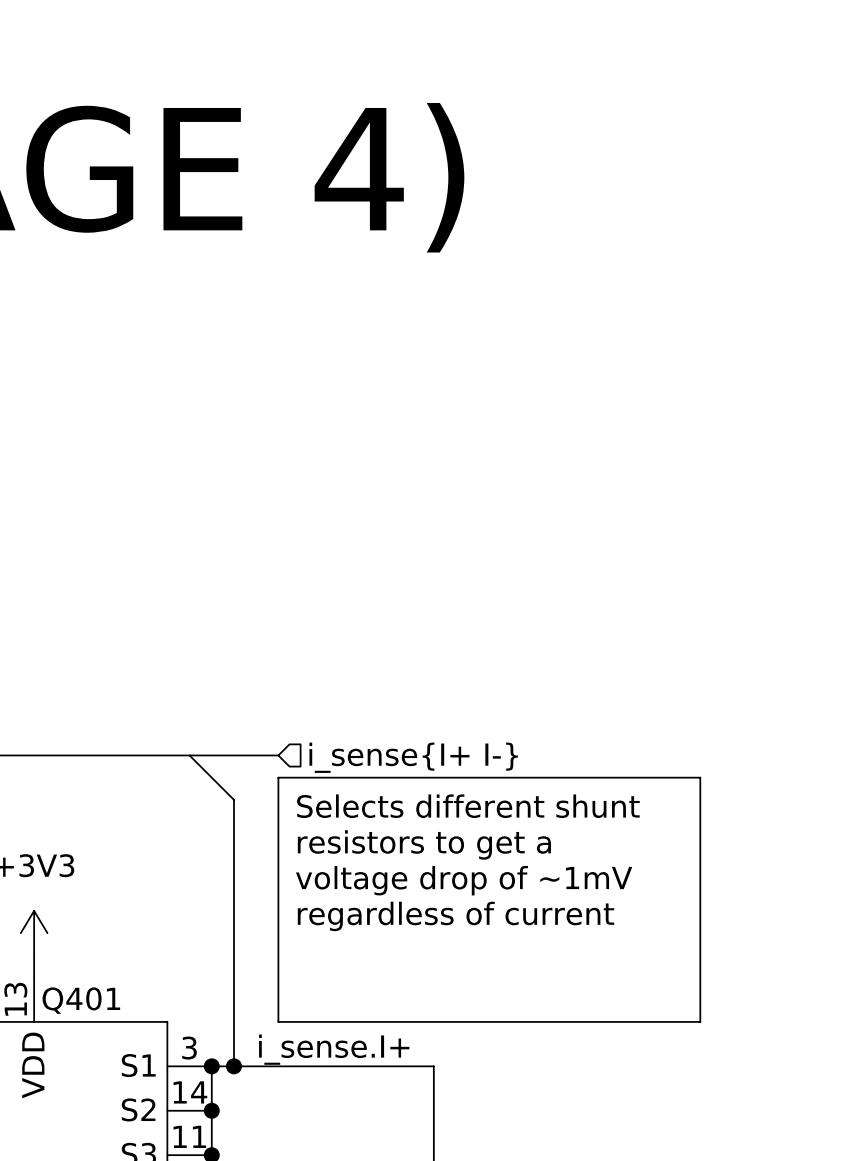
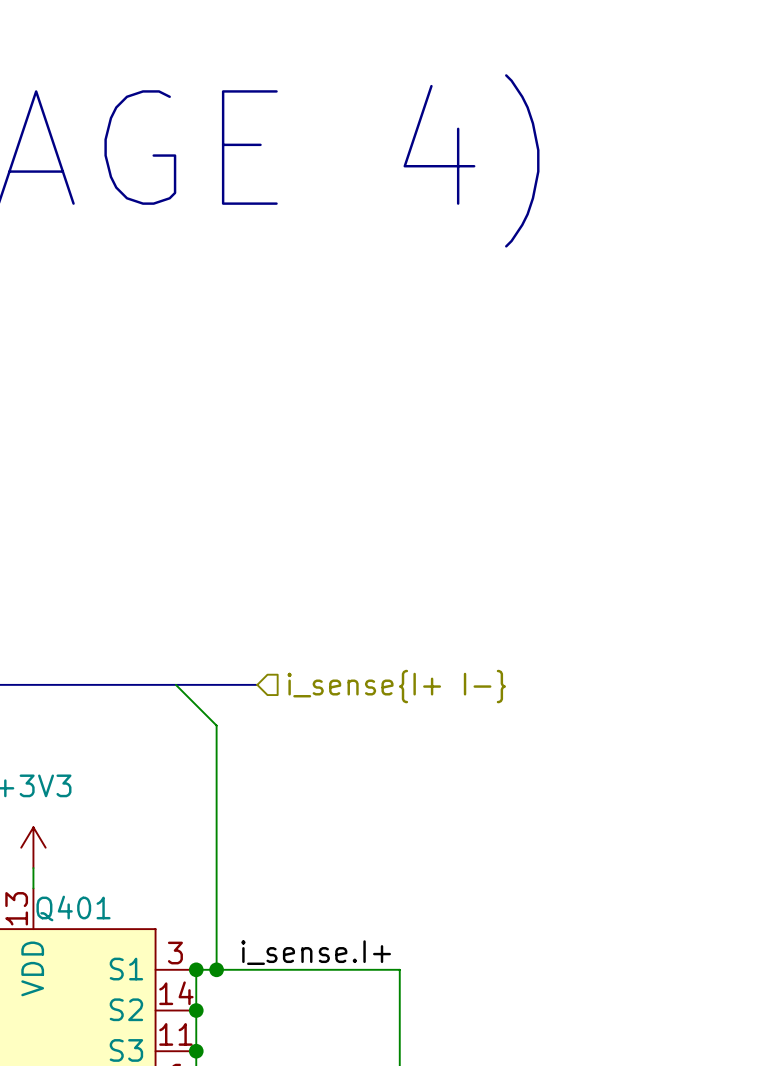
line: (278, 777) (700, 777) (700, 1021) (278, 1021) (278, 777) -> none
text: Selects different shunt (468, 806) -> none
text: resistors to get a (424, 844) -> none
text: voltage drop of ~1mV (464, 880) -> none
text: regardless of current (456, 916) -> none

